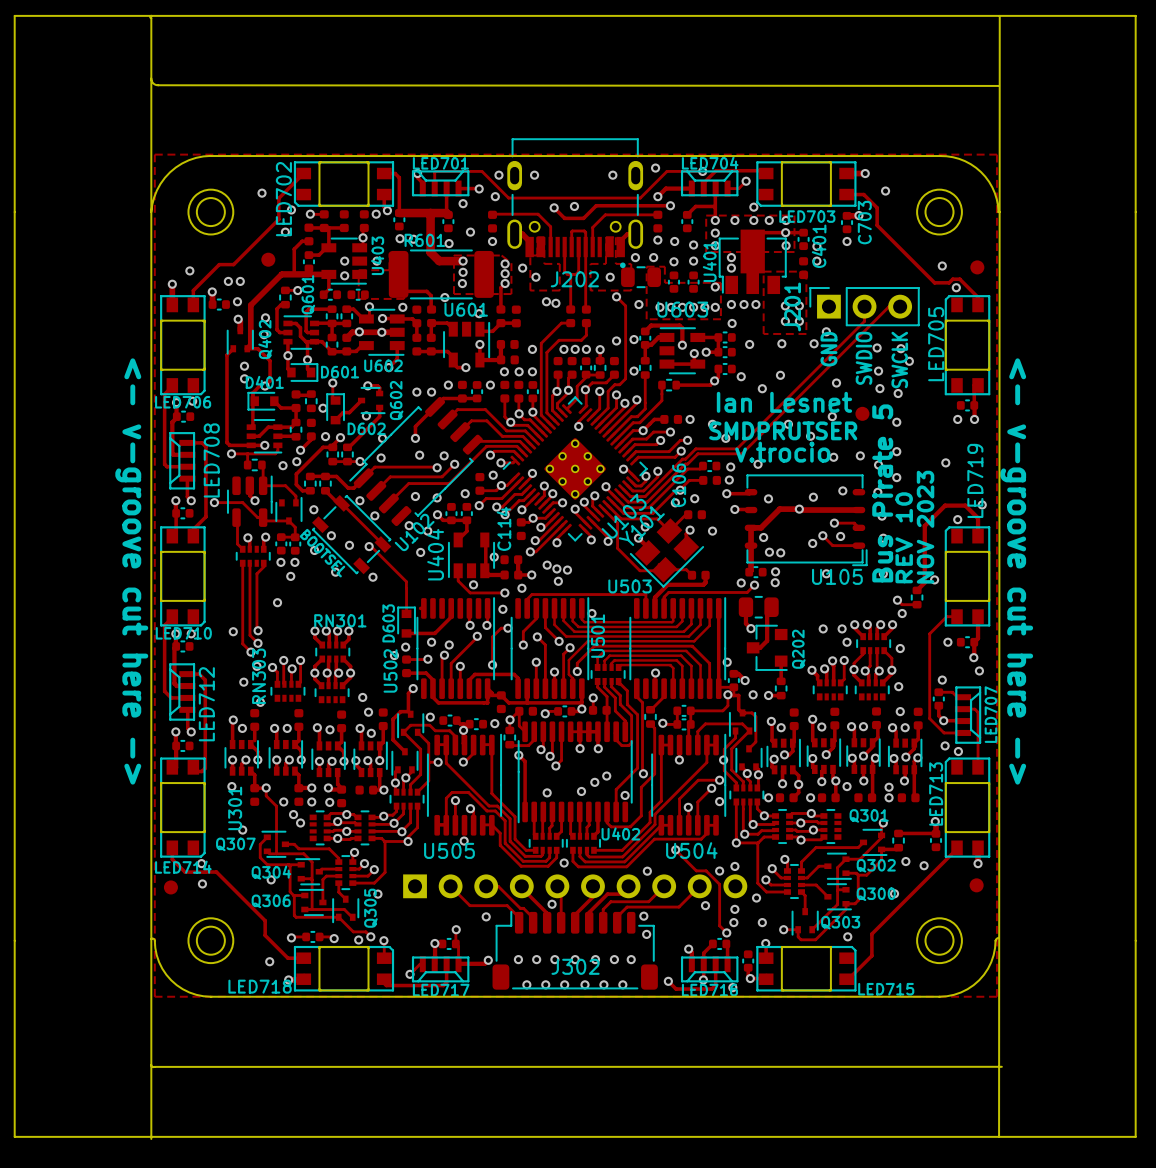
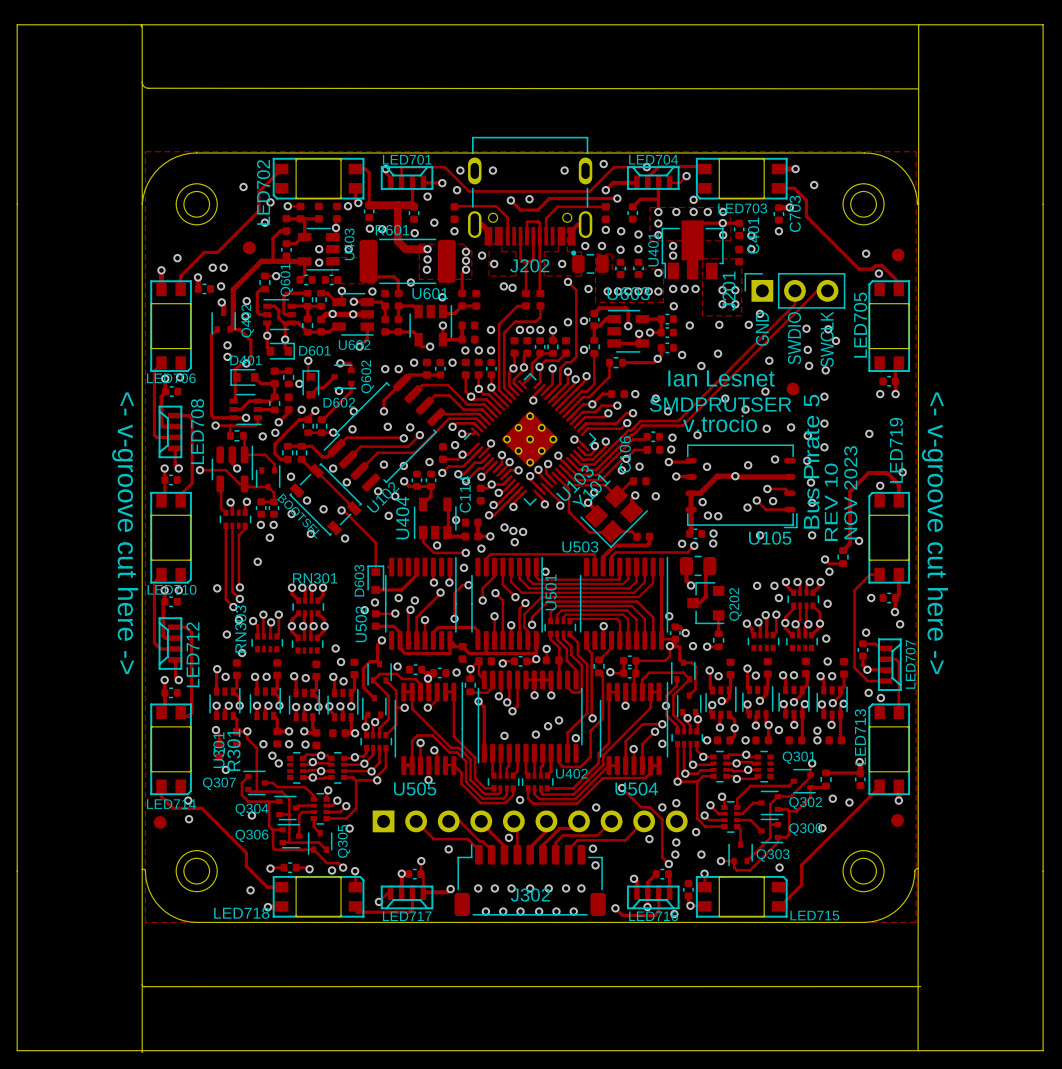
track: none -> (215, 730) (219, 733) (219, 743)
R301: none -> (219, 750)

